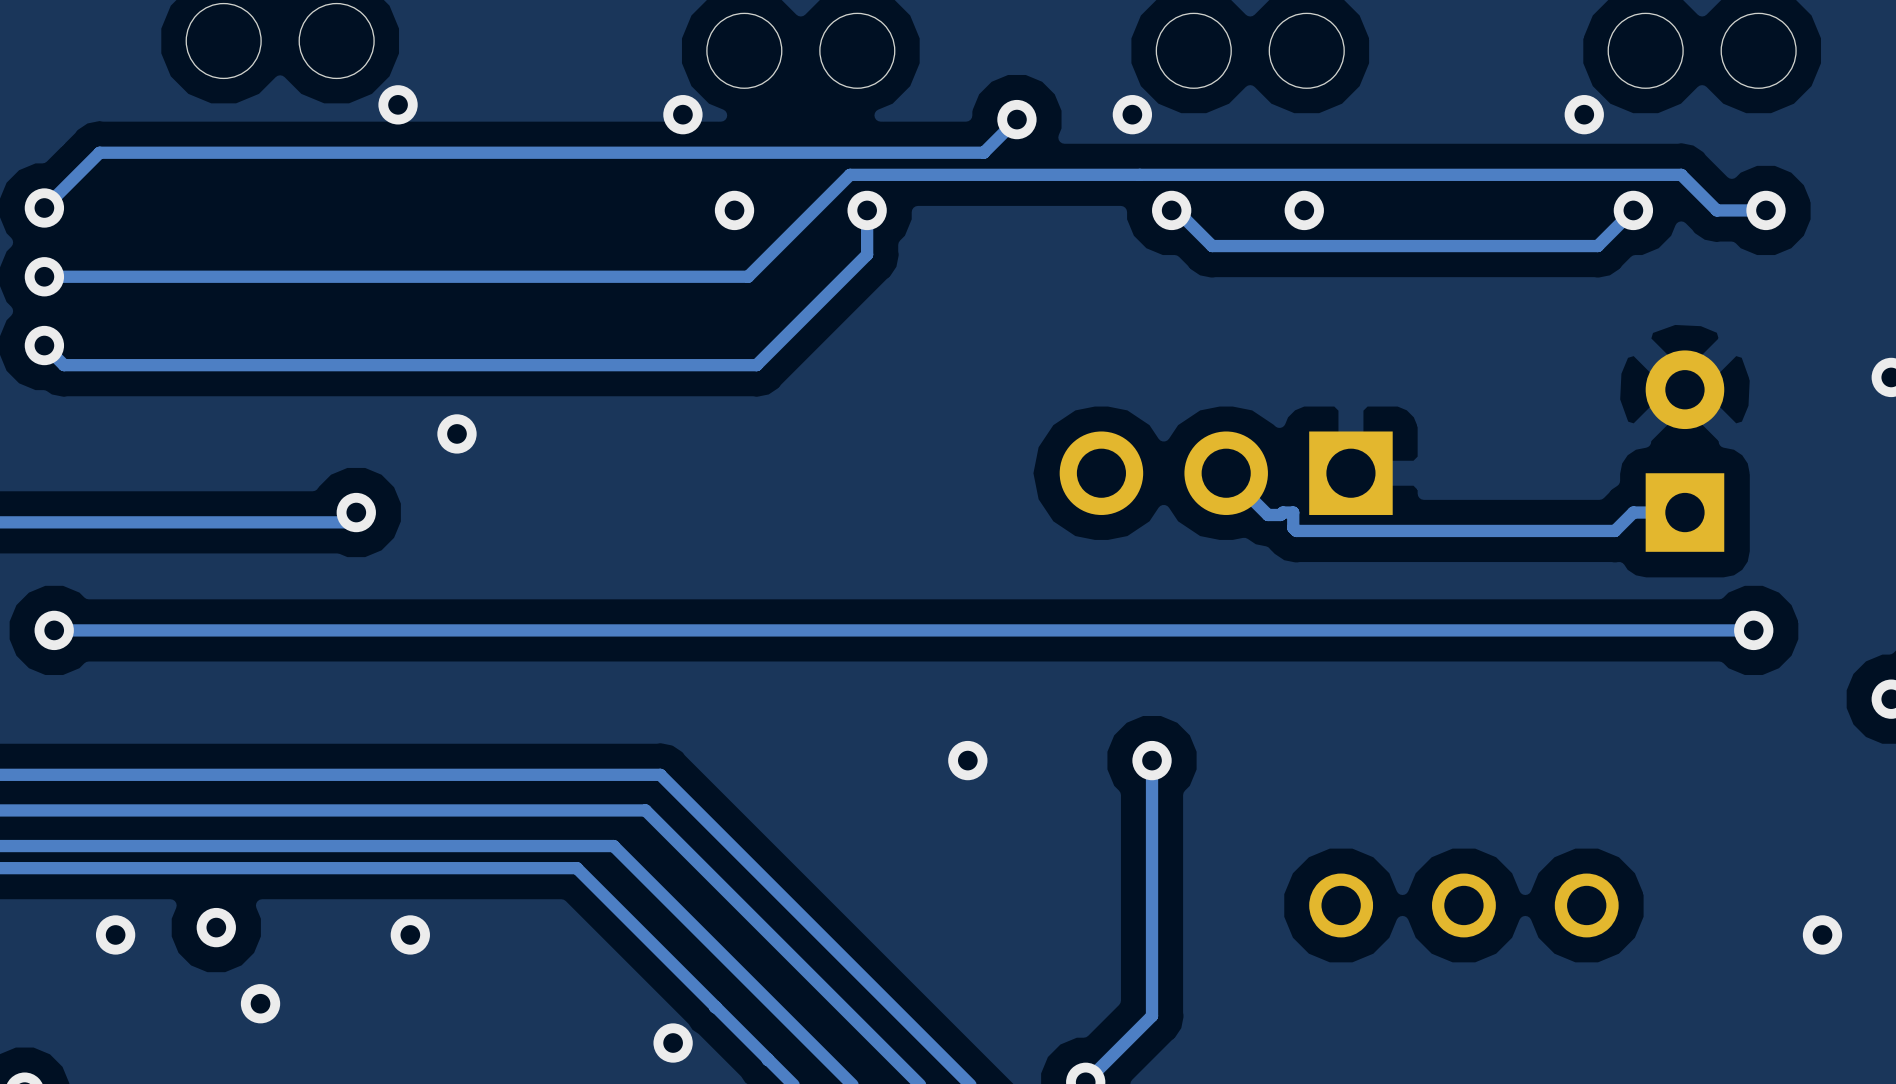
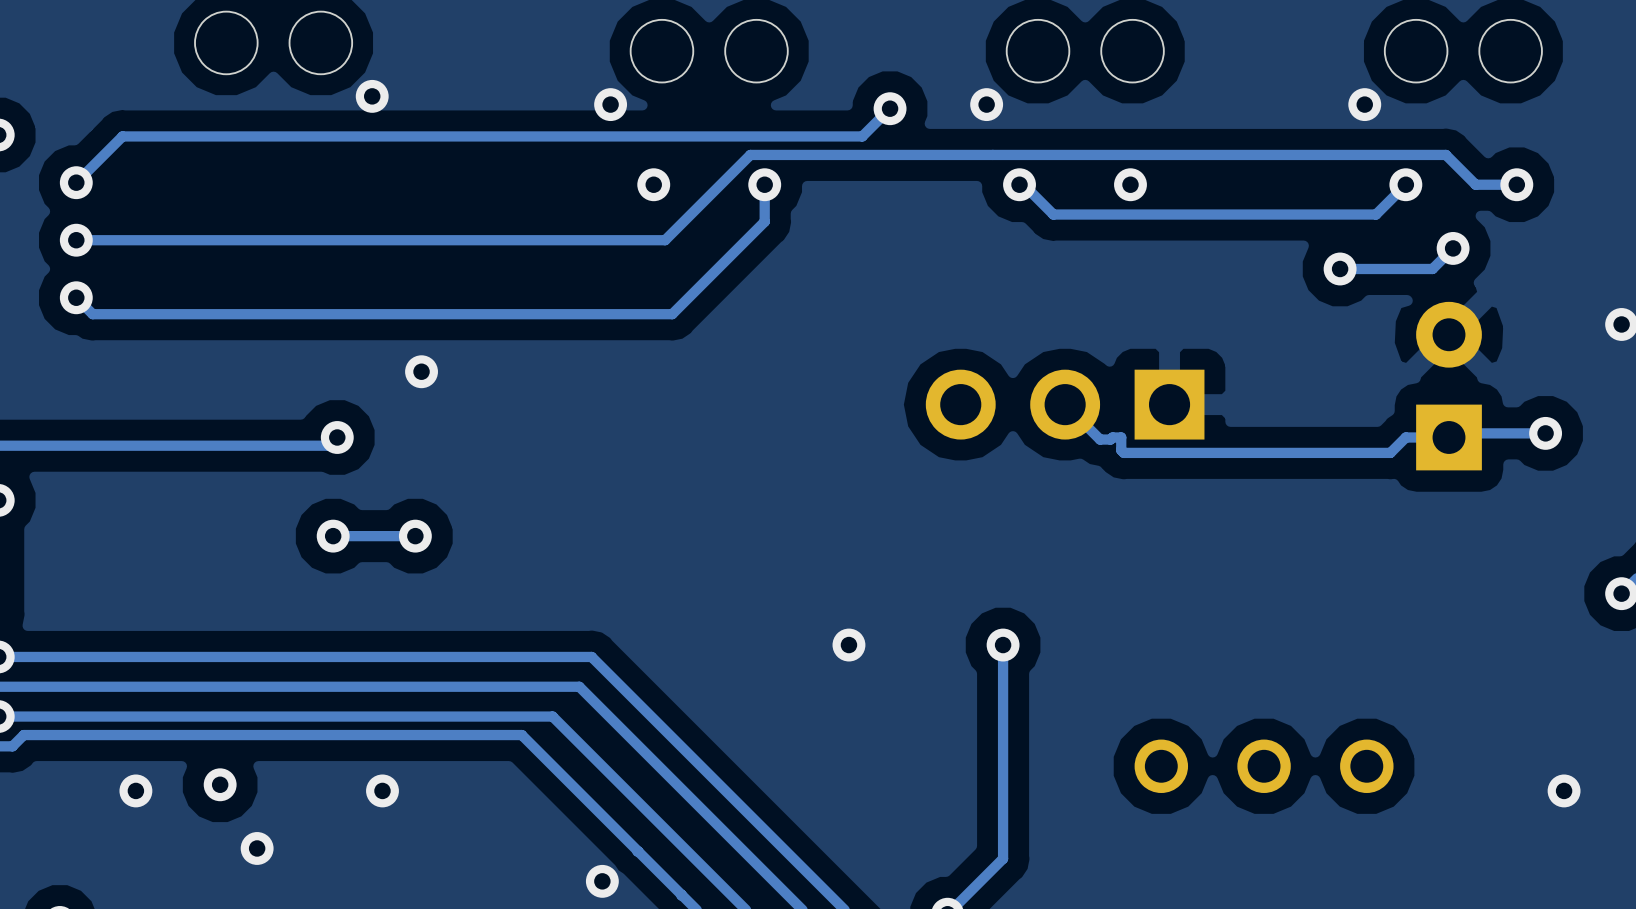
track: none -> (1453, 248) (1432, 268) (1340, 268)
via: none -> (1453, 248)
via: none -> (1340, 268)
track: none -> (1545, 433) (1453, 433) (1449, 437)
via: (54, 630) -> none
track: (351, 630) (54, 630) -> none
via: none -> (333, 536)
via: none -> (415, 536)
track: (1753, 630) (449, 630) -> none
via position: (1753, 630) -> (1545, 433)

